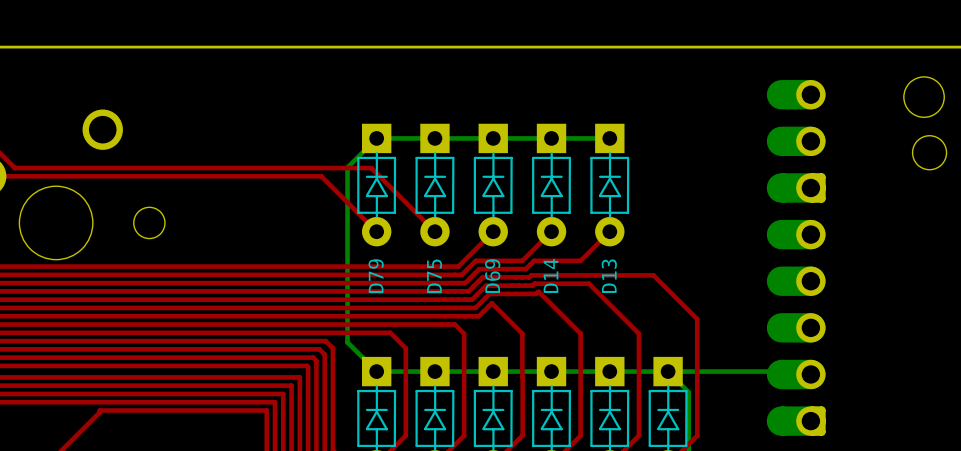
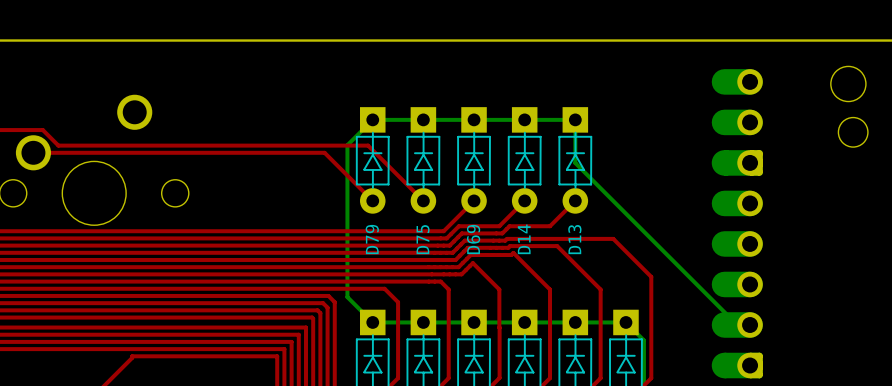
bottom track: (668, 371) (793, 371) -> (575, 119) (575, 163) (734, 322)

